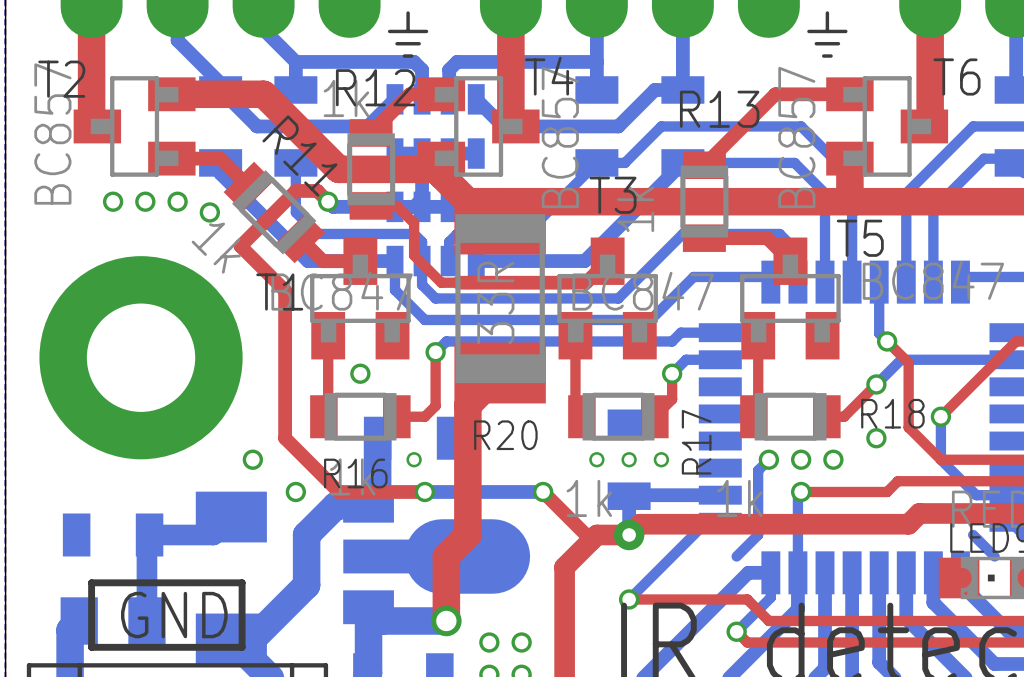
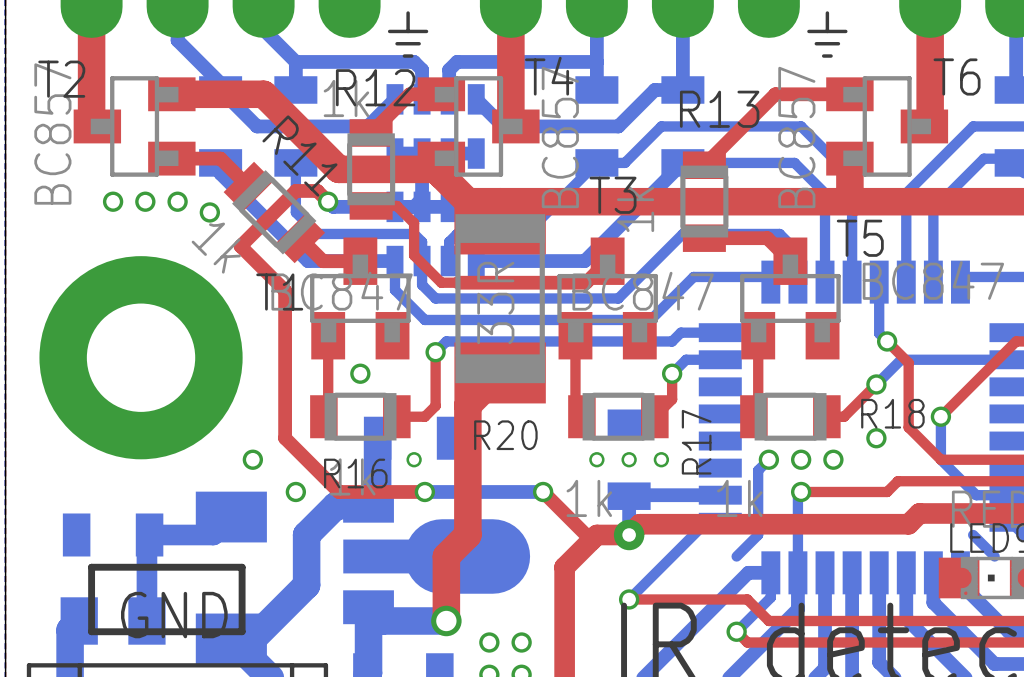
line: (91, 582) (242, 582) -> (91, 582) (91, 567) (242, 567) (242, 582)
line: (91, 631) (91, 647) (242, 647) (242, 631) -> (91, 631) (242, 631)

